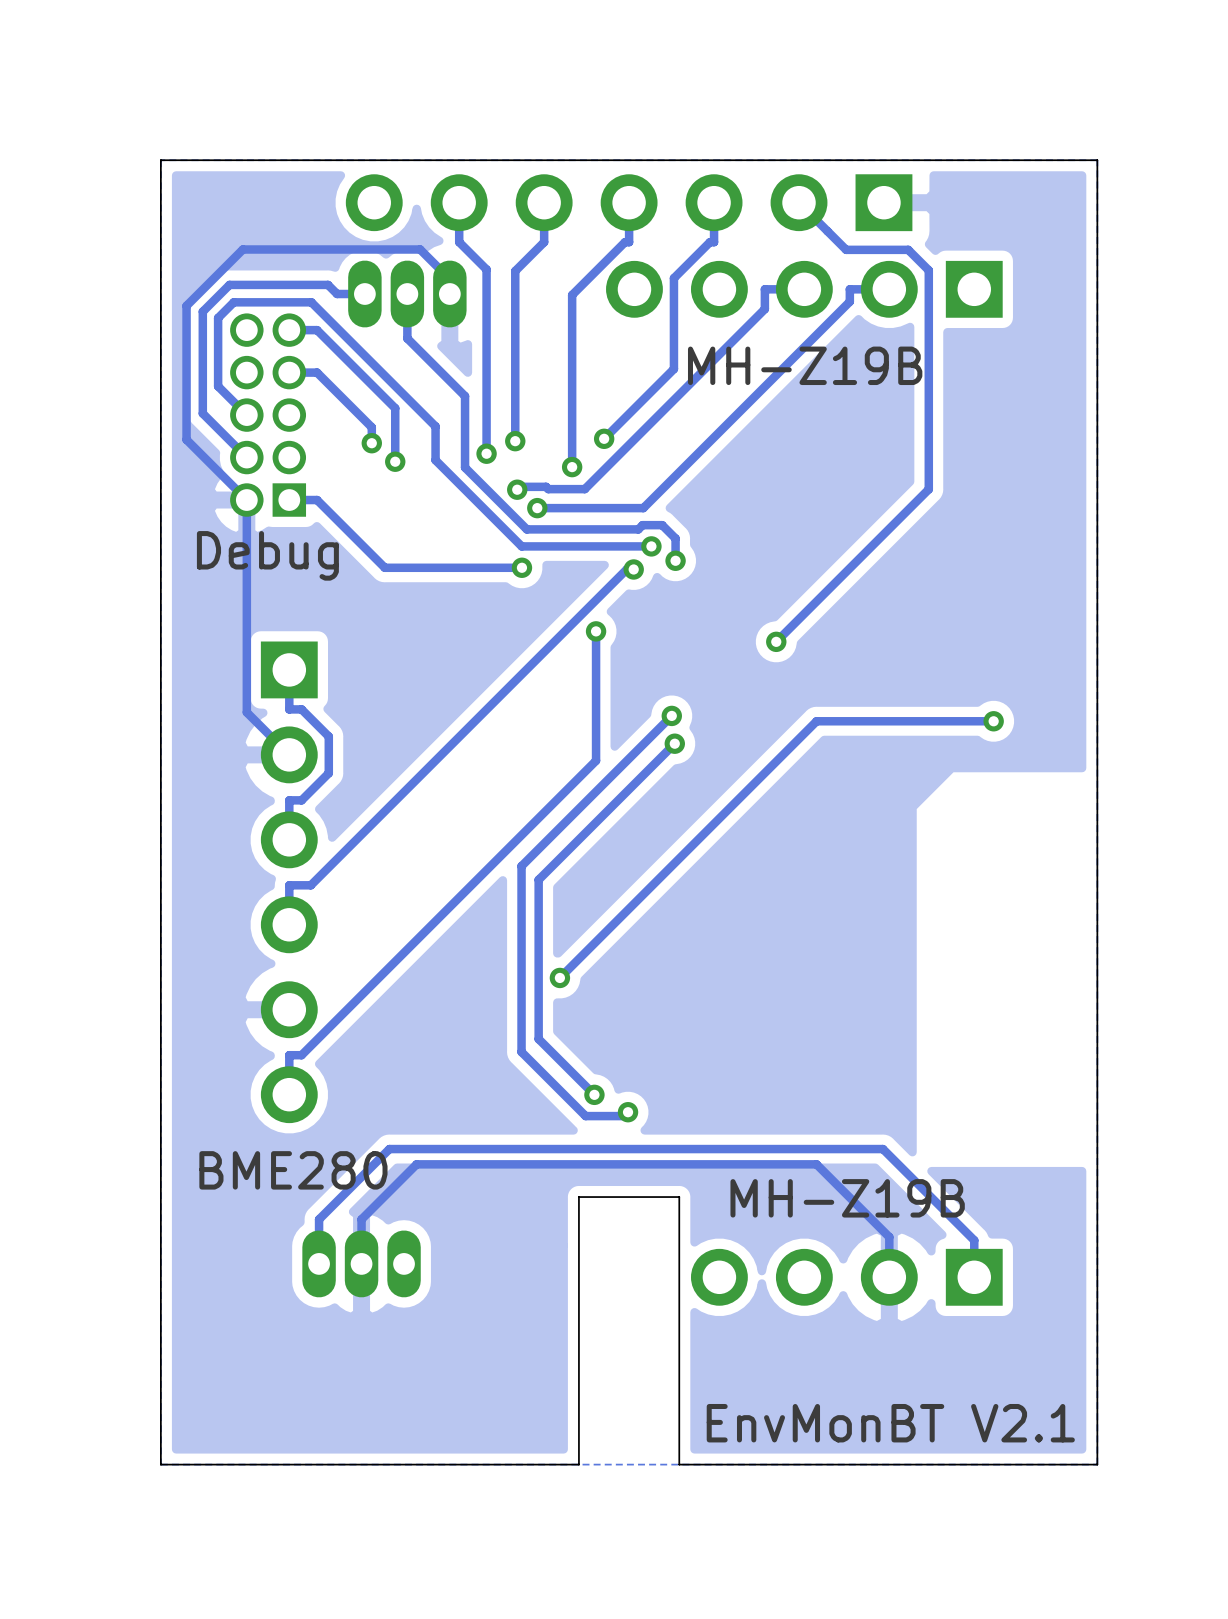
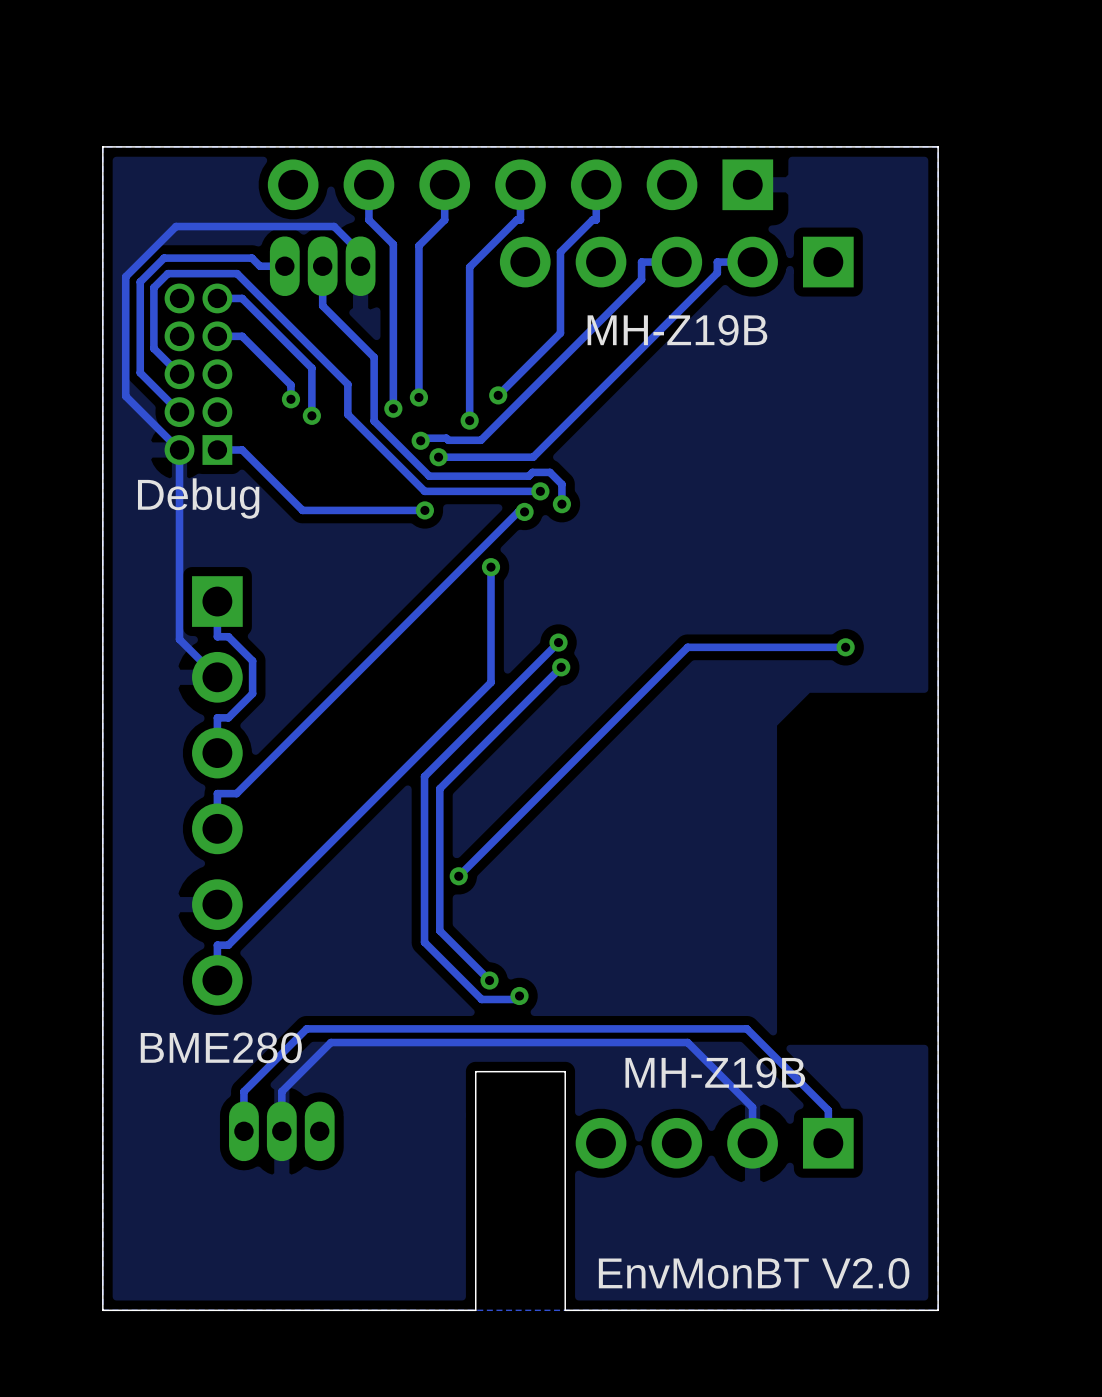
track: (799, 202) (846, 249) (908, 249) (928, 270) (928, 489) (776, 641) -> none
via: (776, 641) -> none
text: EnvMonBT V2.1 (890, 1423) -> EnvMonBT V2.0 (754, 1273)

